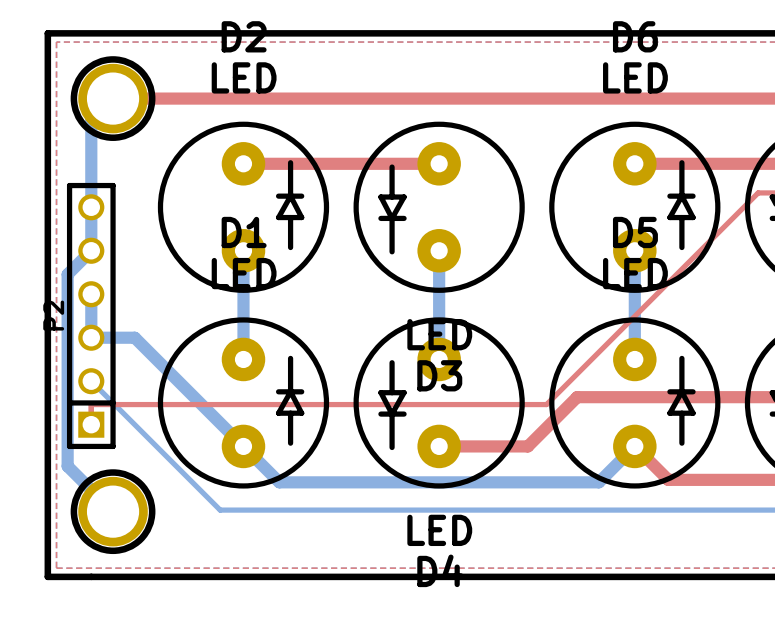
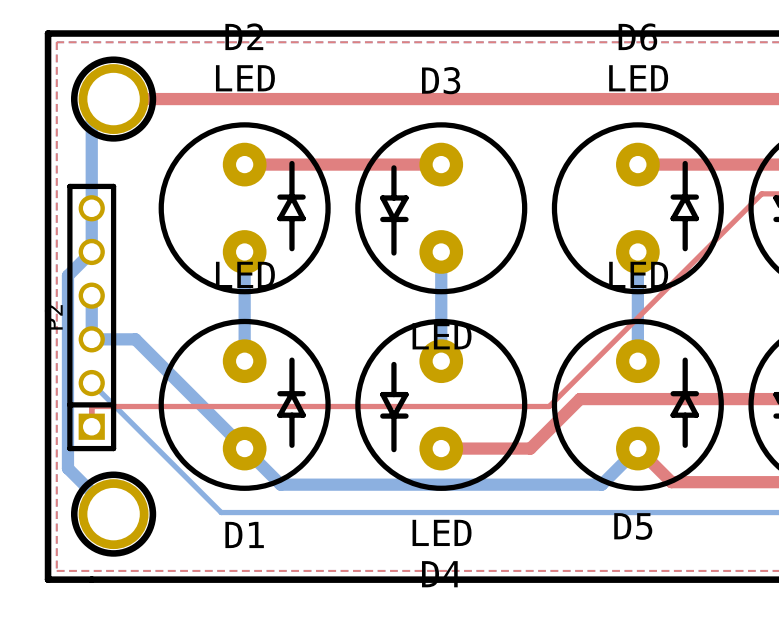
D1 name position: D1 (244, 232) -> D1 (244, 534)
D5 name position: D5 (635, 232) -> D5 (633, 526)
D3 name position: D3 (439, 375) -> D3 (441, 80)

